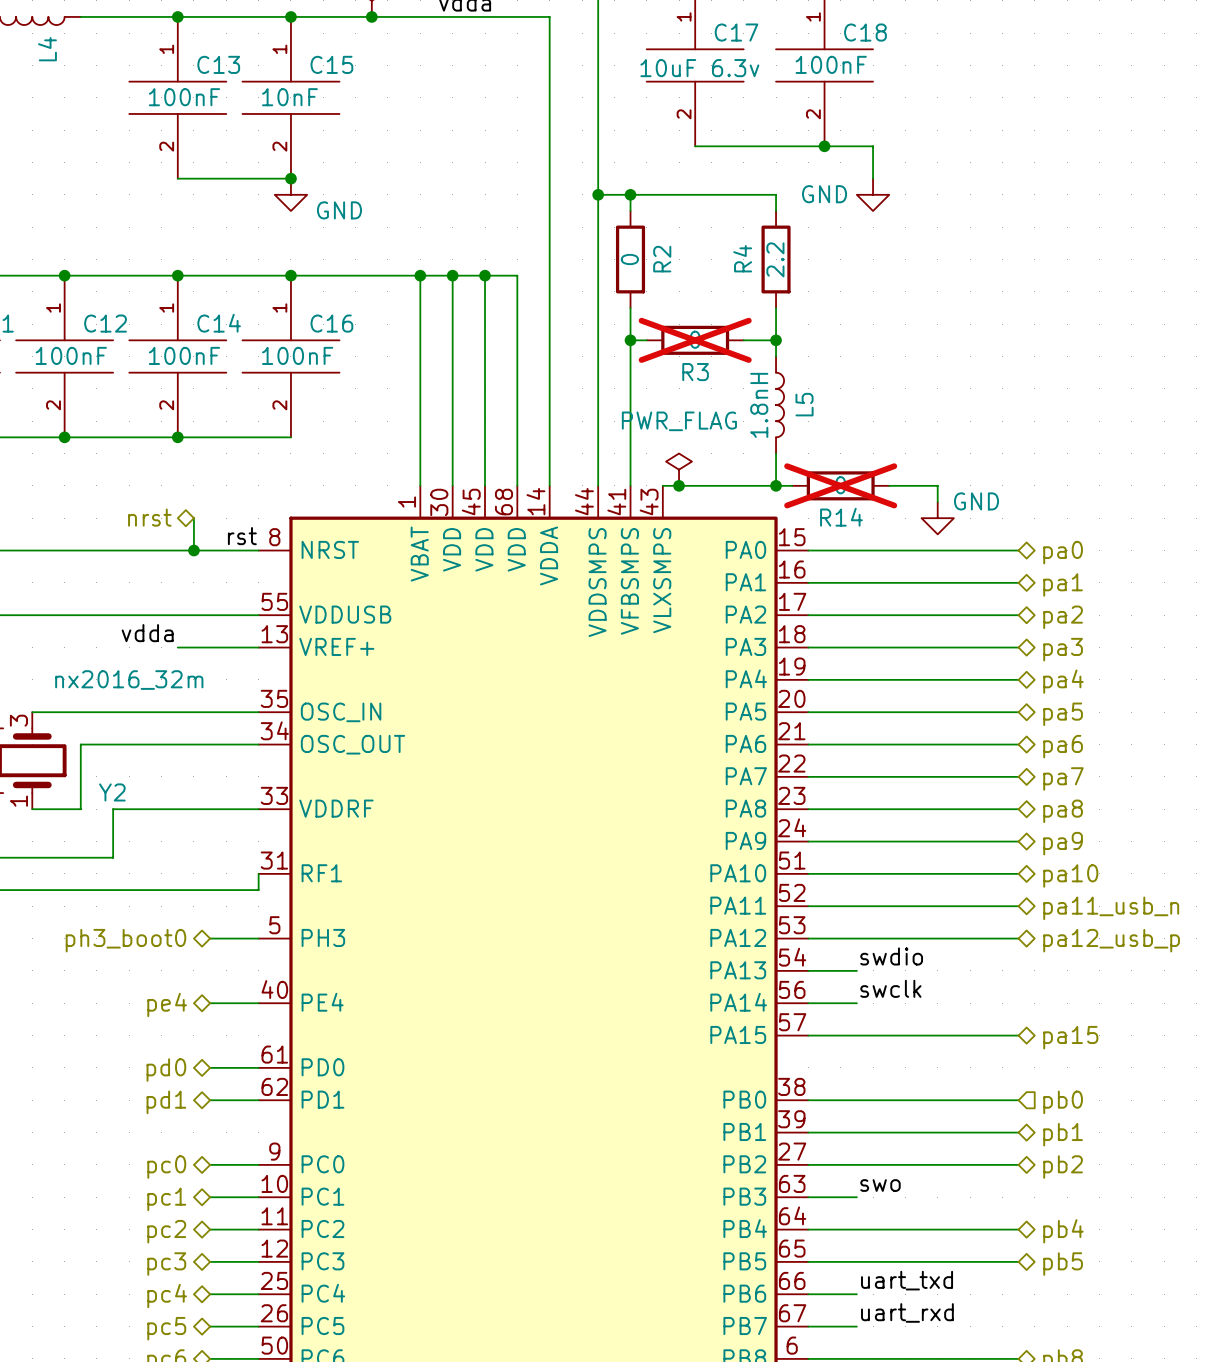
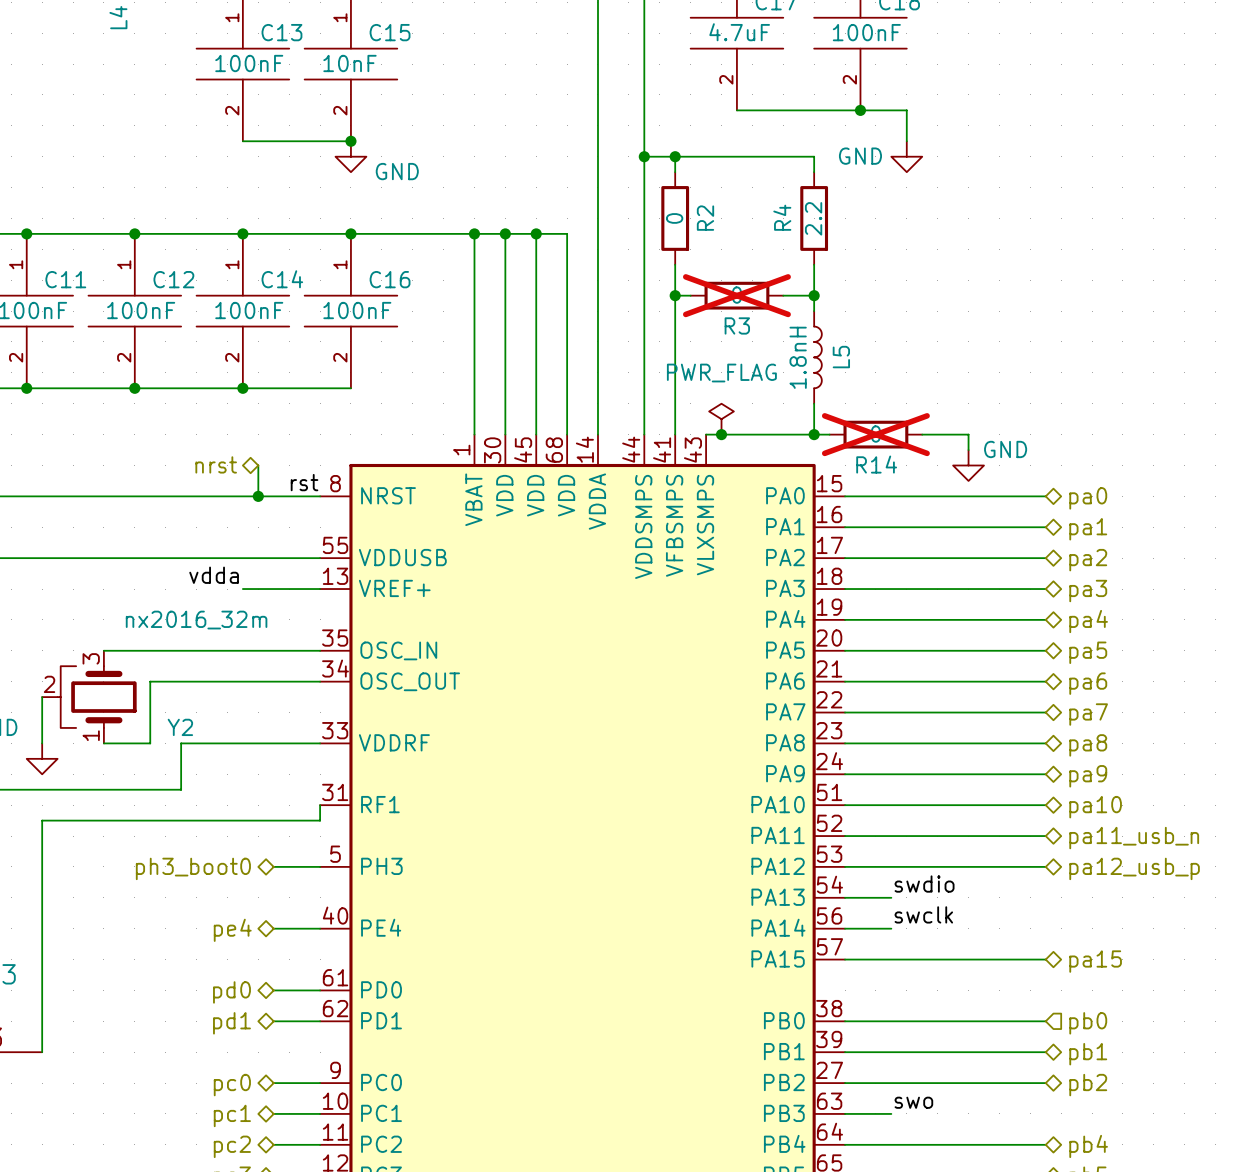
C17 value: 10uF 6.3v (699, 68) -> 4.7uF (739, 32)

